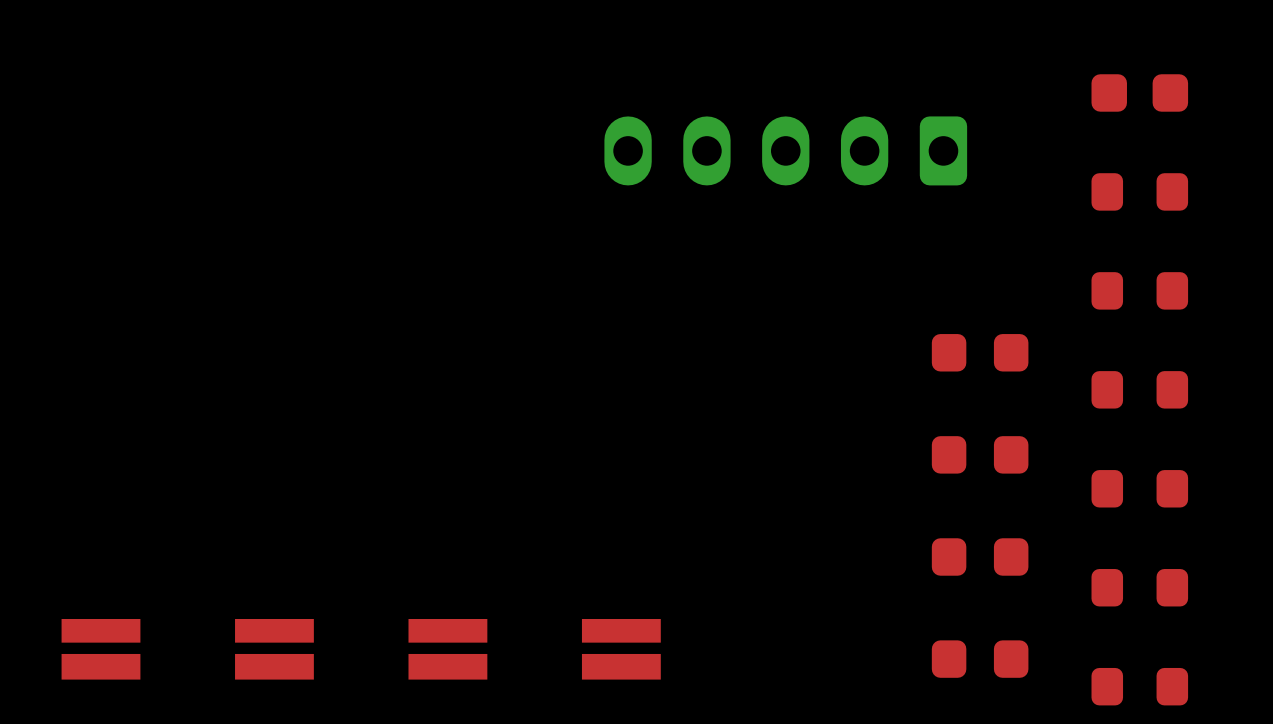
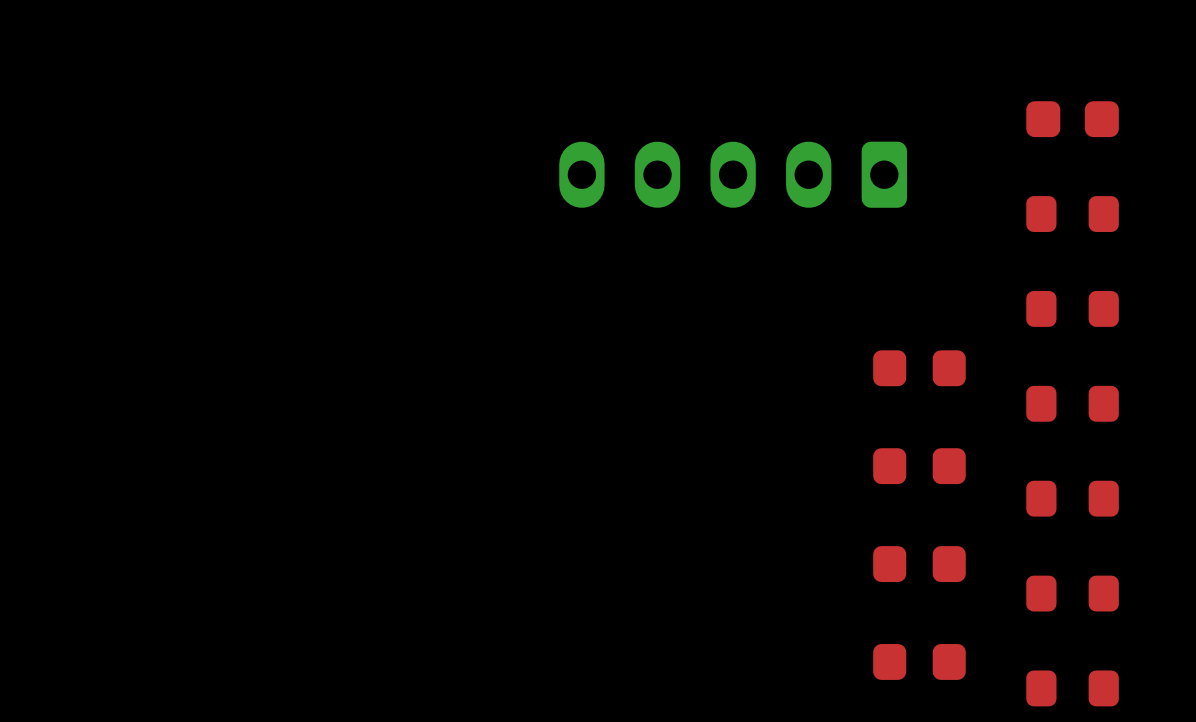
part: (100, 649) -> none
part: (274, 649) -> none
part: (447, 649) -> none
part: (621, 649) -> none

